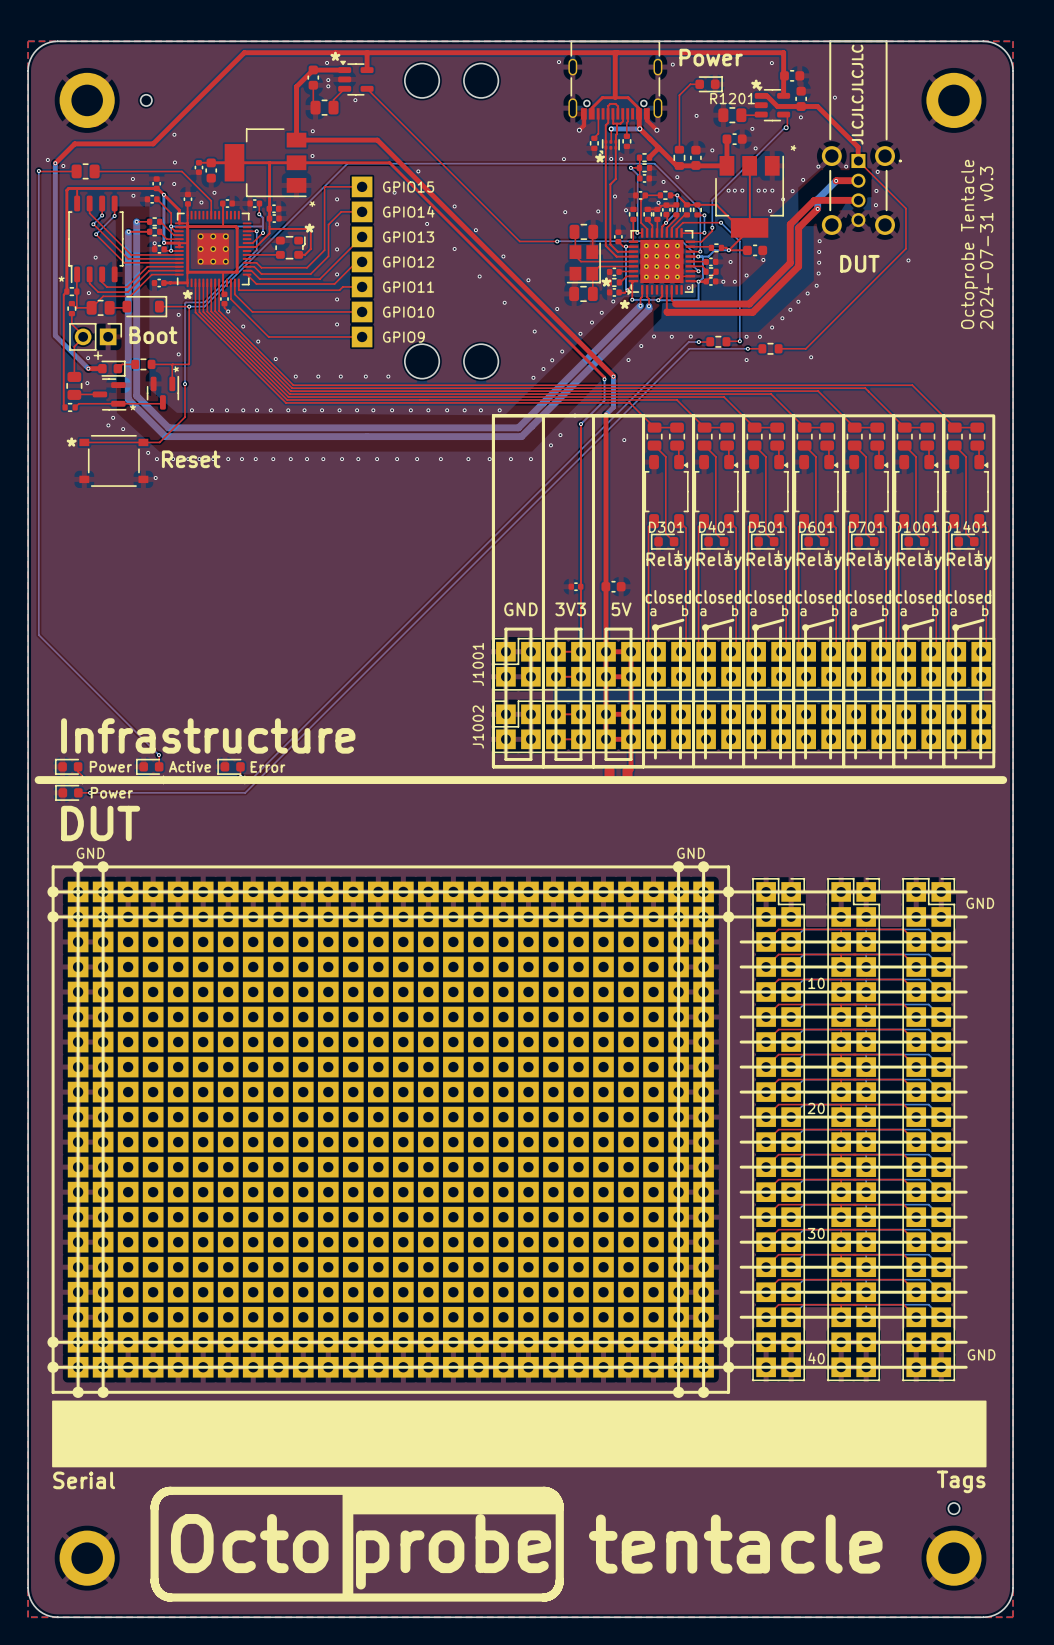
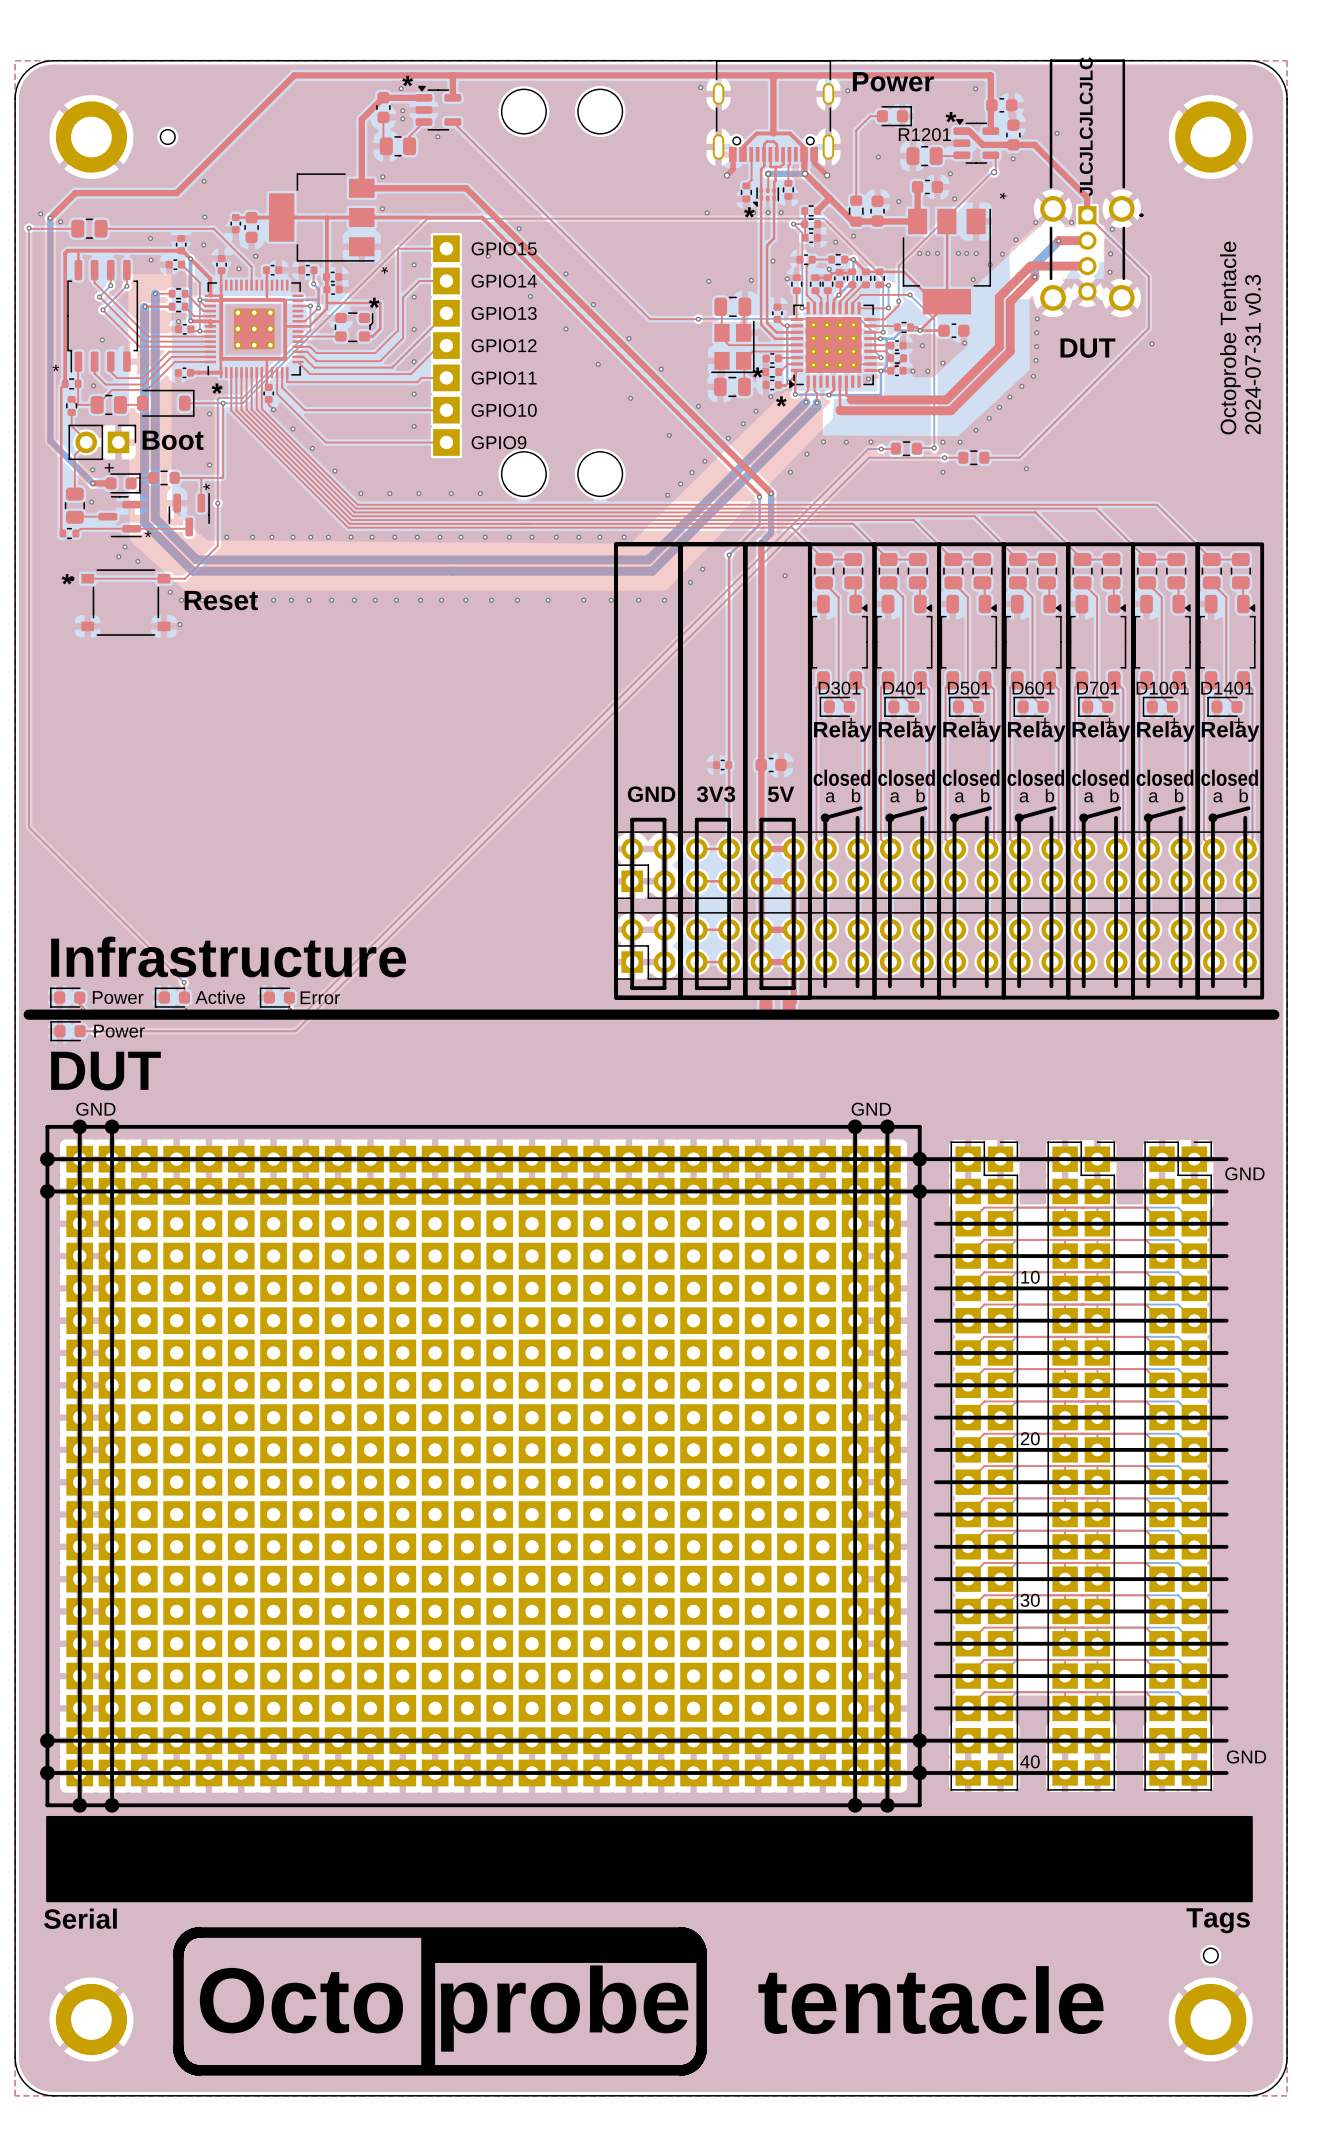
J1001: (743, 664) -> none
part: none -> (939, 865)
J1002: (743, 726) -> none
part: none -> (939, 945)

